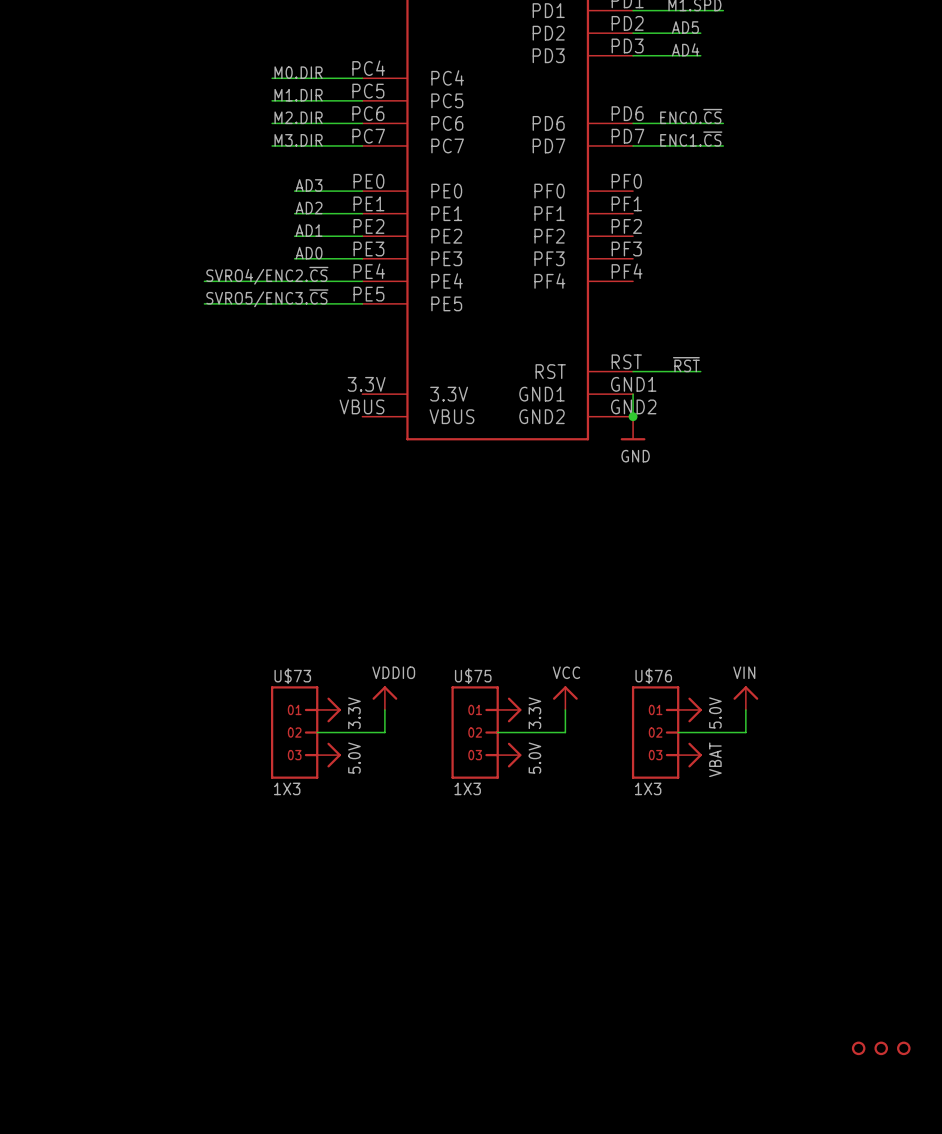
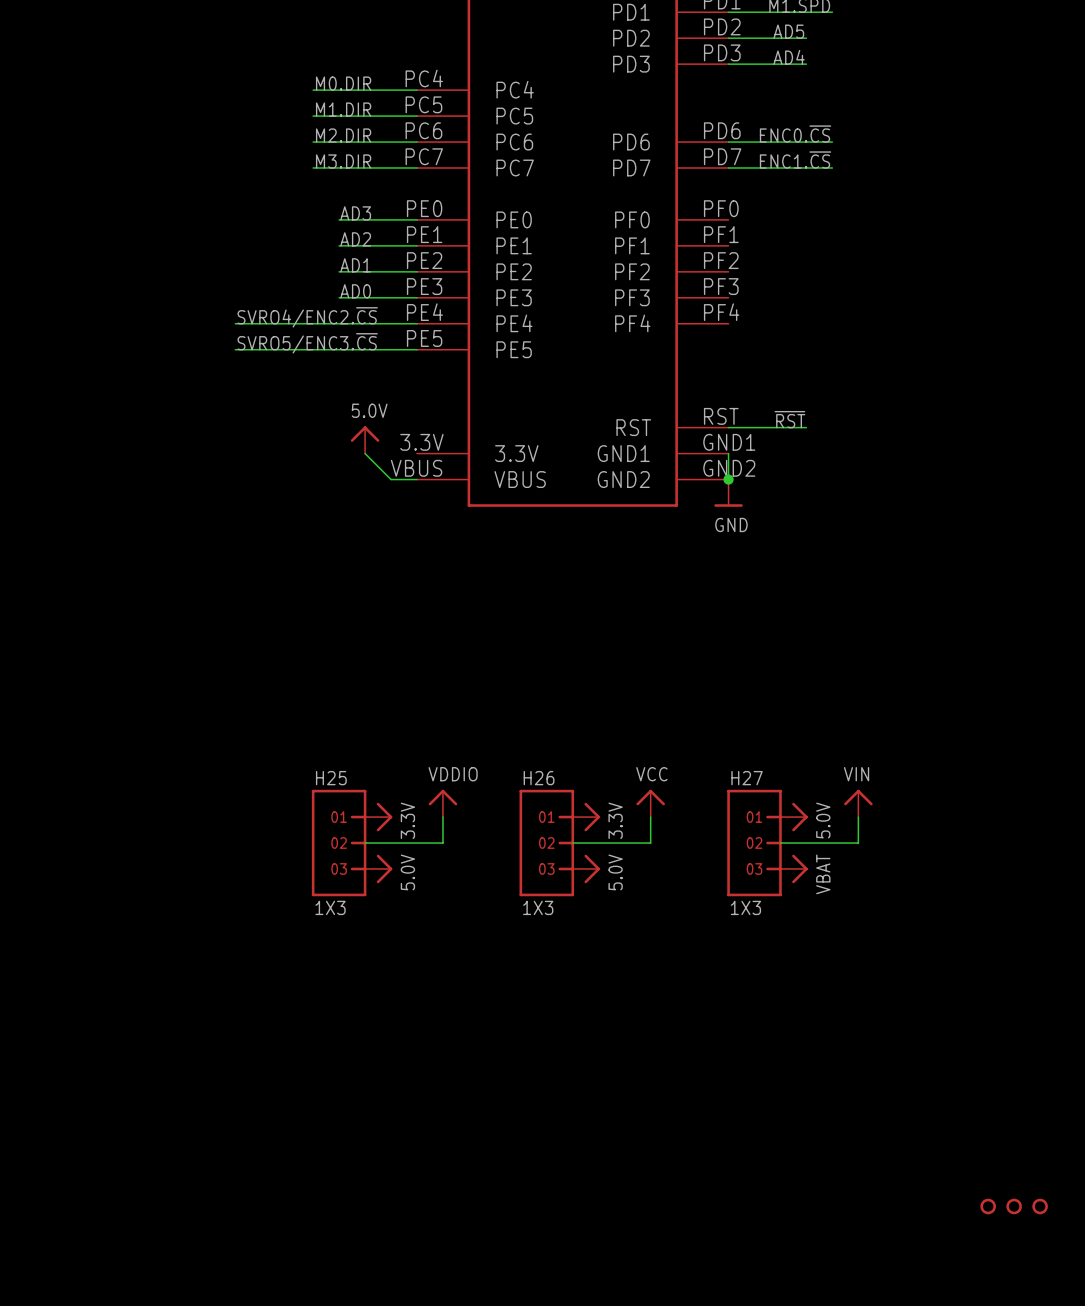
power symbol: none -> 5.0V (365, 439)
wire: none -> (365, 453) (391, 479) (417, 479)
U$73 name: U$73 (292, 676) -> H25 (331, 778)
U$75 name: U$75 (473, 676) -> H26 (539, 778)
U$76 name: U$76 (653, 676) -> H27 (747, 778)

